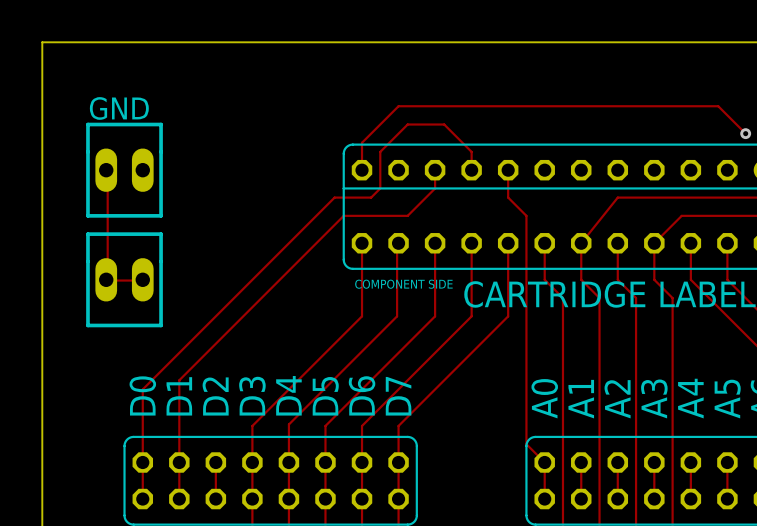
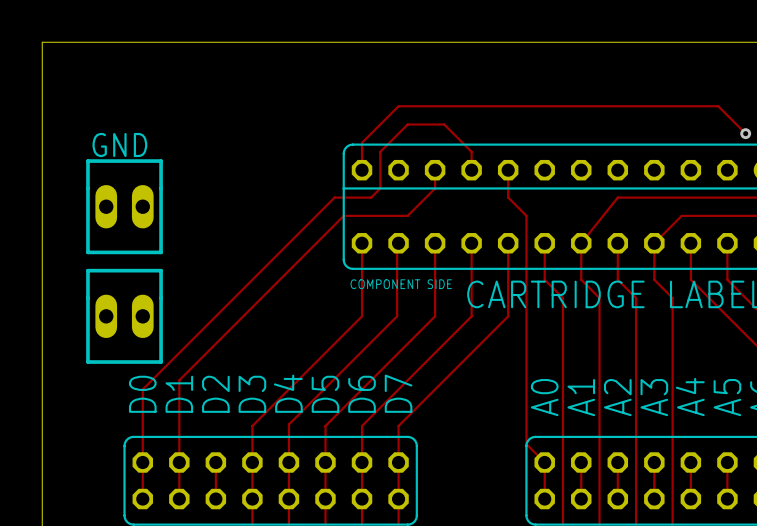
track: (106, 170) (106, 279) (142, 279) -> none
GND position: (124, 170) -> (124, 206)
part position: (124, 279) -> (124, 316)

